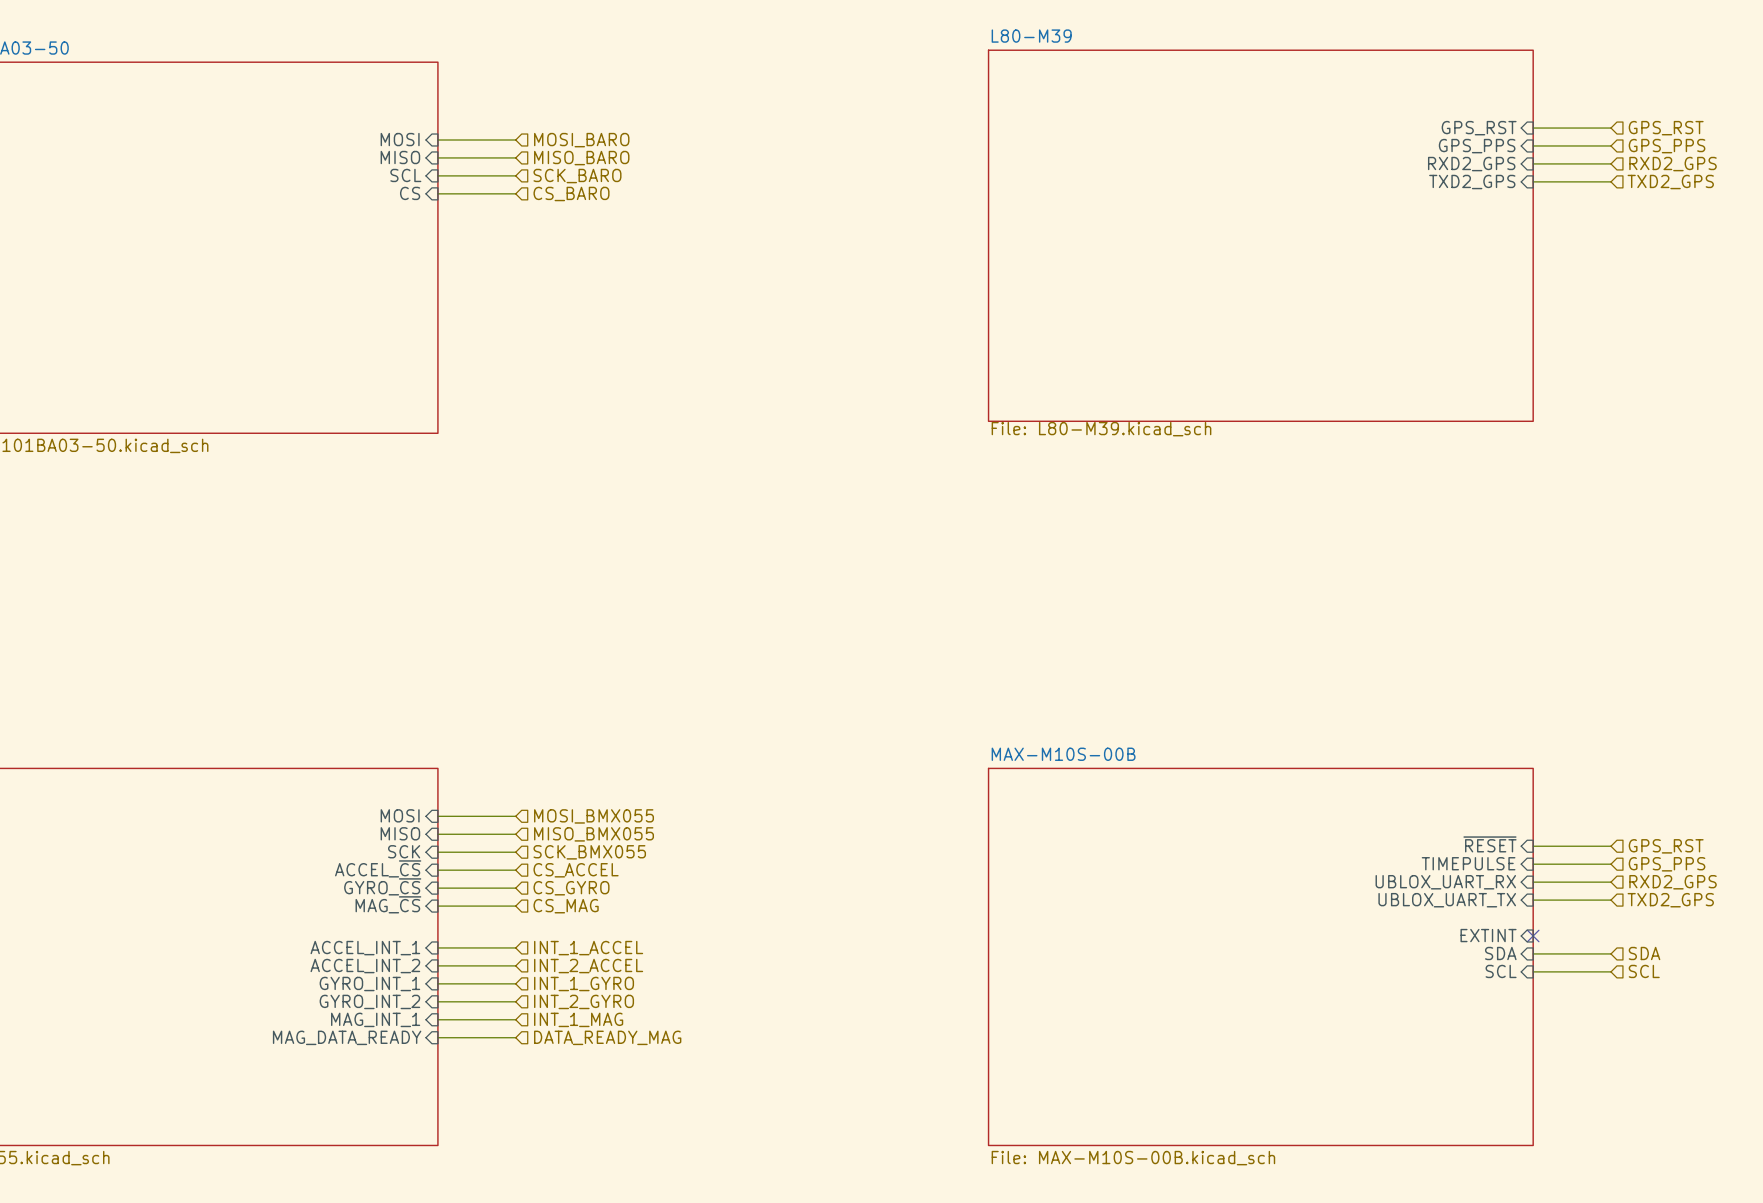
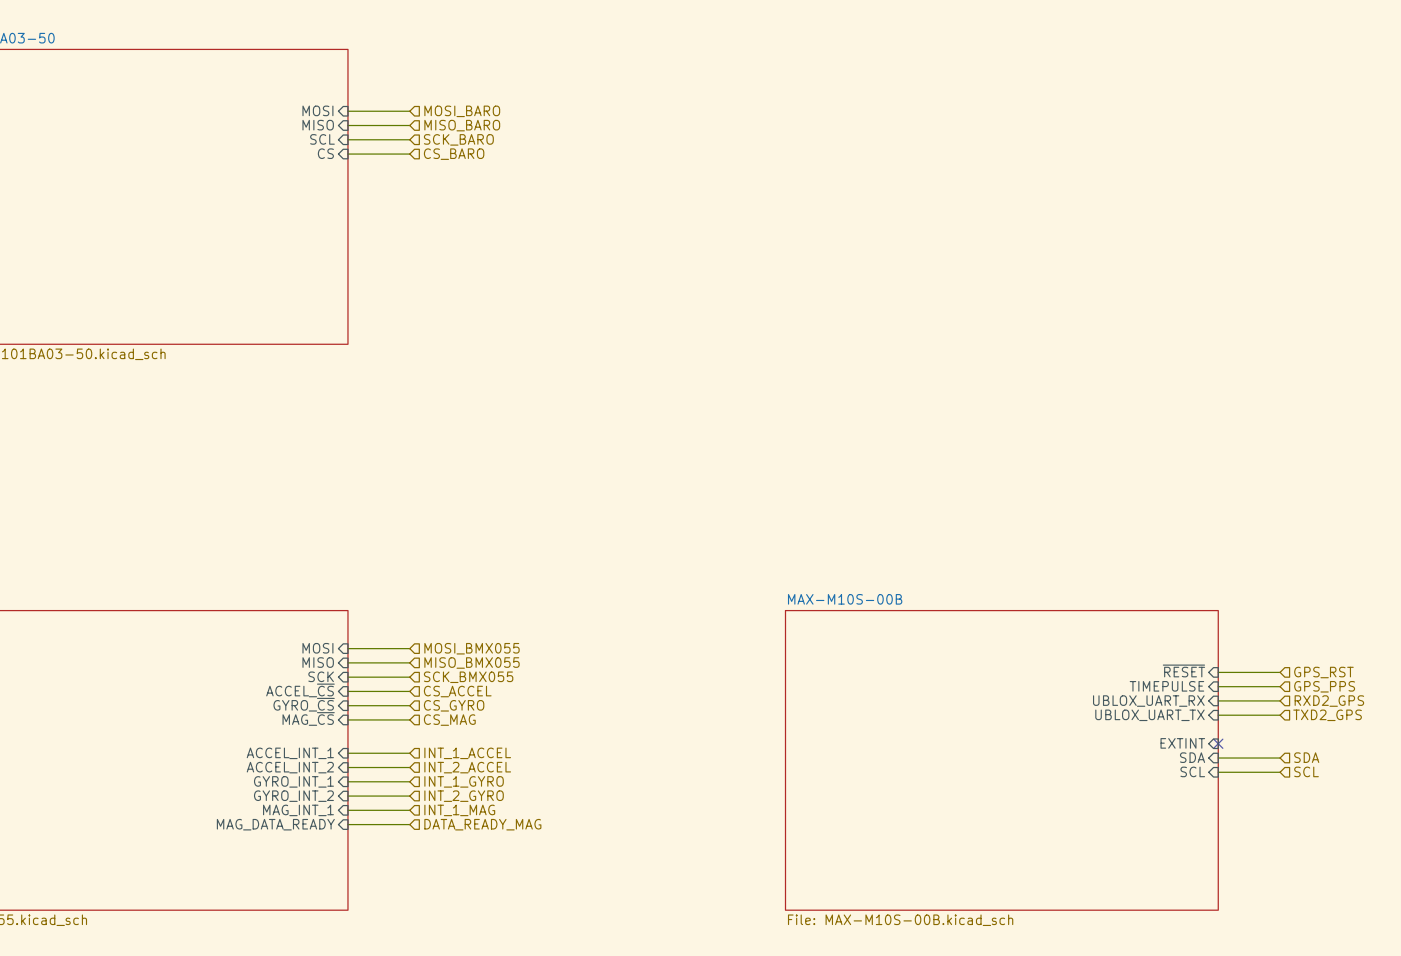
sheet pin: GPS_RST (1479, 128) -> none
wire: (1533, 128) (1610, 128) -> none
hierarchical label: GPS_RST (1666, 128) -> none
wire: (1533, 145) (1610, 145) -> none
sheet pin: GPS_PPS (1477, 146) -> none
hierarchical label: GPS_PPS (1667, 146) -> none
wire: (1533, 163) (1610, 163) -> none
sheet pin: RXD2_GPS (1471, 164) -> none
hierarchical label: RXD2_GPS (1673, 164) -> none
wire: (1533, 181) (1610, 181) -> none
sheet pin: TXD2_GPS (1472, 182) -> none
hierarchical label: TXD2_GPS (1670, 182) -> none
sheet L80-M39: File: L80-M39.kicad_sch (1260, 235) -> none

